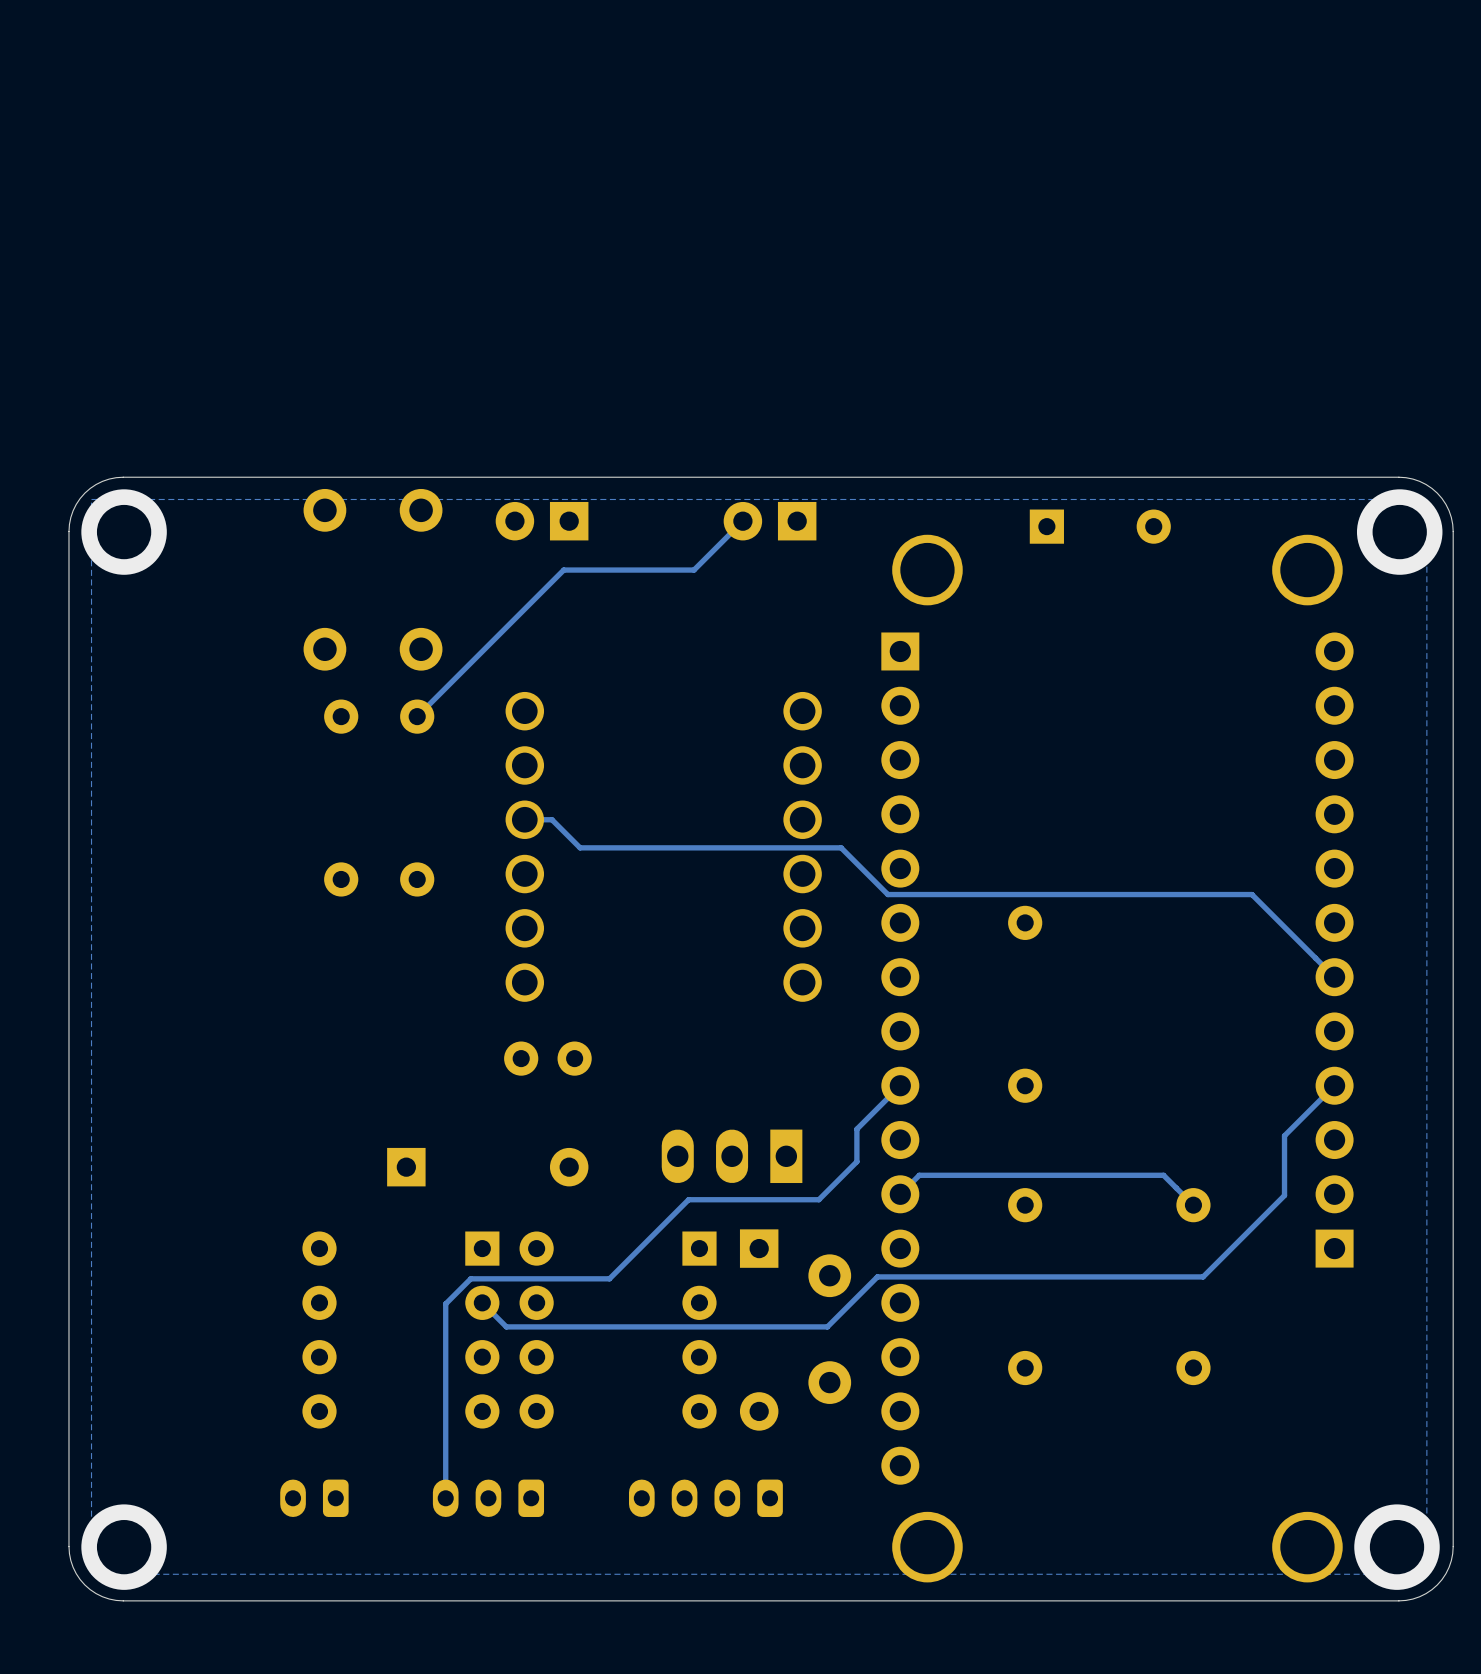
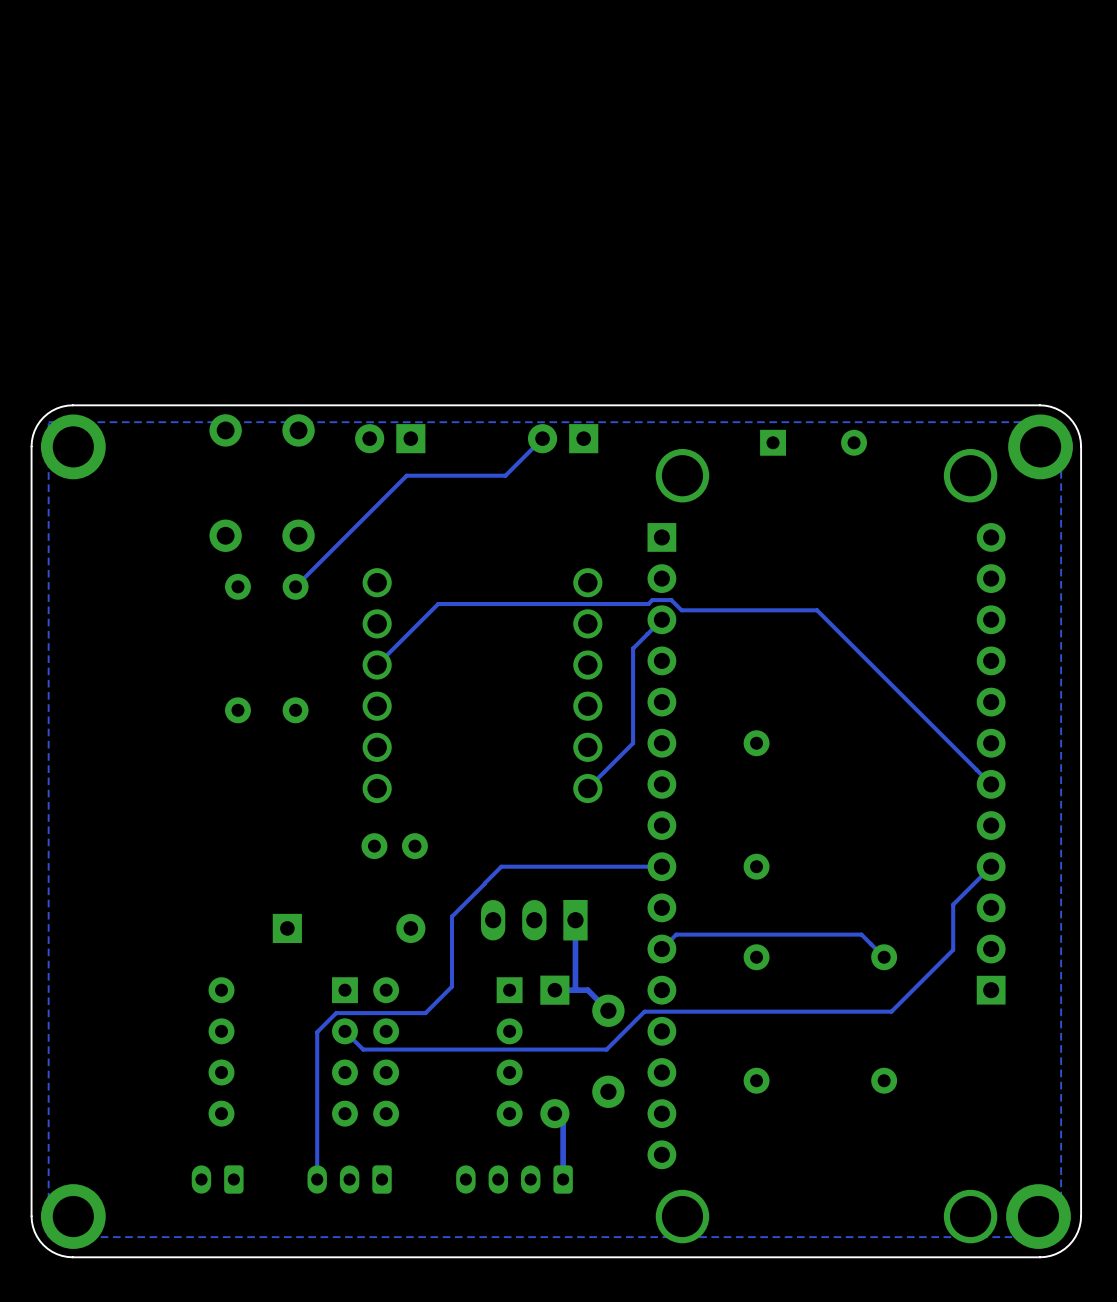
track: none -> (661, 619) (633, 648) (633, 743) (587, 788)
track: (524, 819) (551, 819) (580, 847) (841, 847) (887, 894) (1251, 894) -> (377, 665) (438, 604) (648, 604) (652, 600) (671, 600) (681, 610) (817, 610) (928, 721)
track: (900, 1085) (856, 1129) (856, 1161) (818, 1199) (688, 1199) (609, 1278) (588, 1278) -> (661, 866) (501, 866) (451, 916) (451, 986) (425, 1013)
track: none -> (575, 920) (575, 990)
track: none -> (554, 990) (587, 990) (608, 1010)
track: none -> (554, 1113) (563, 1121) (563, 1179)

